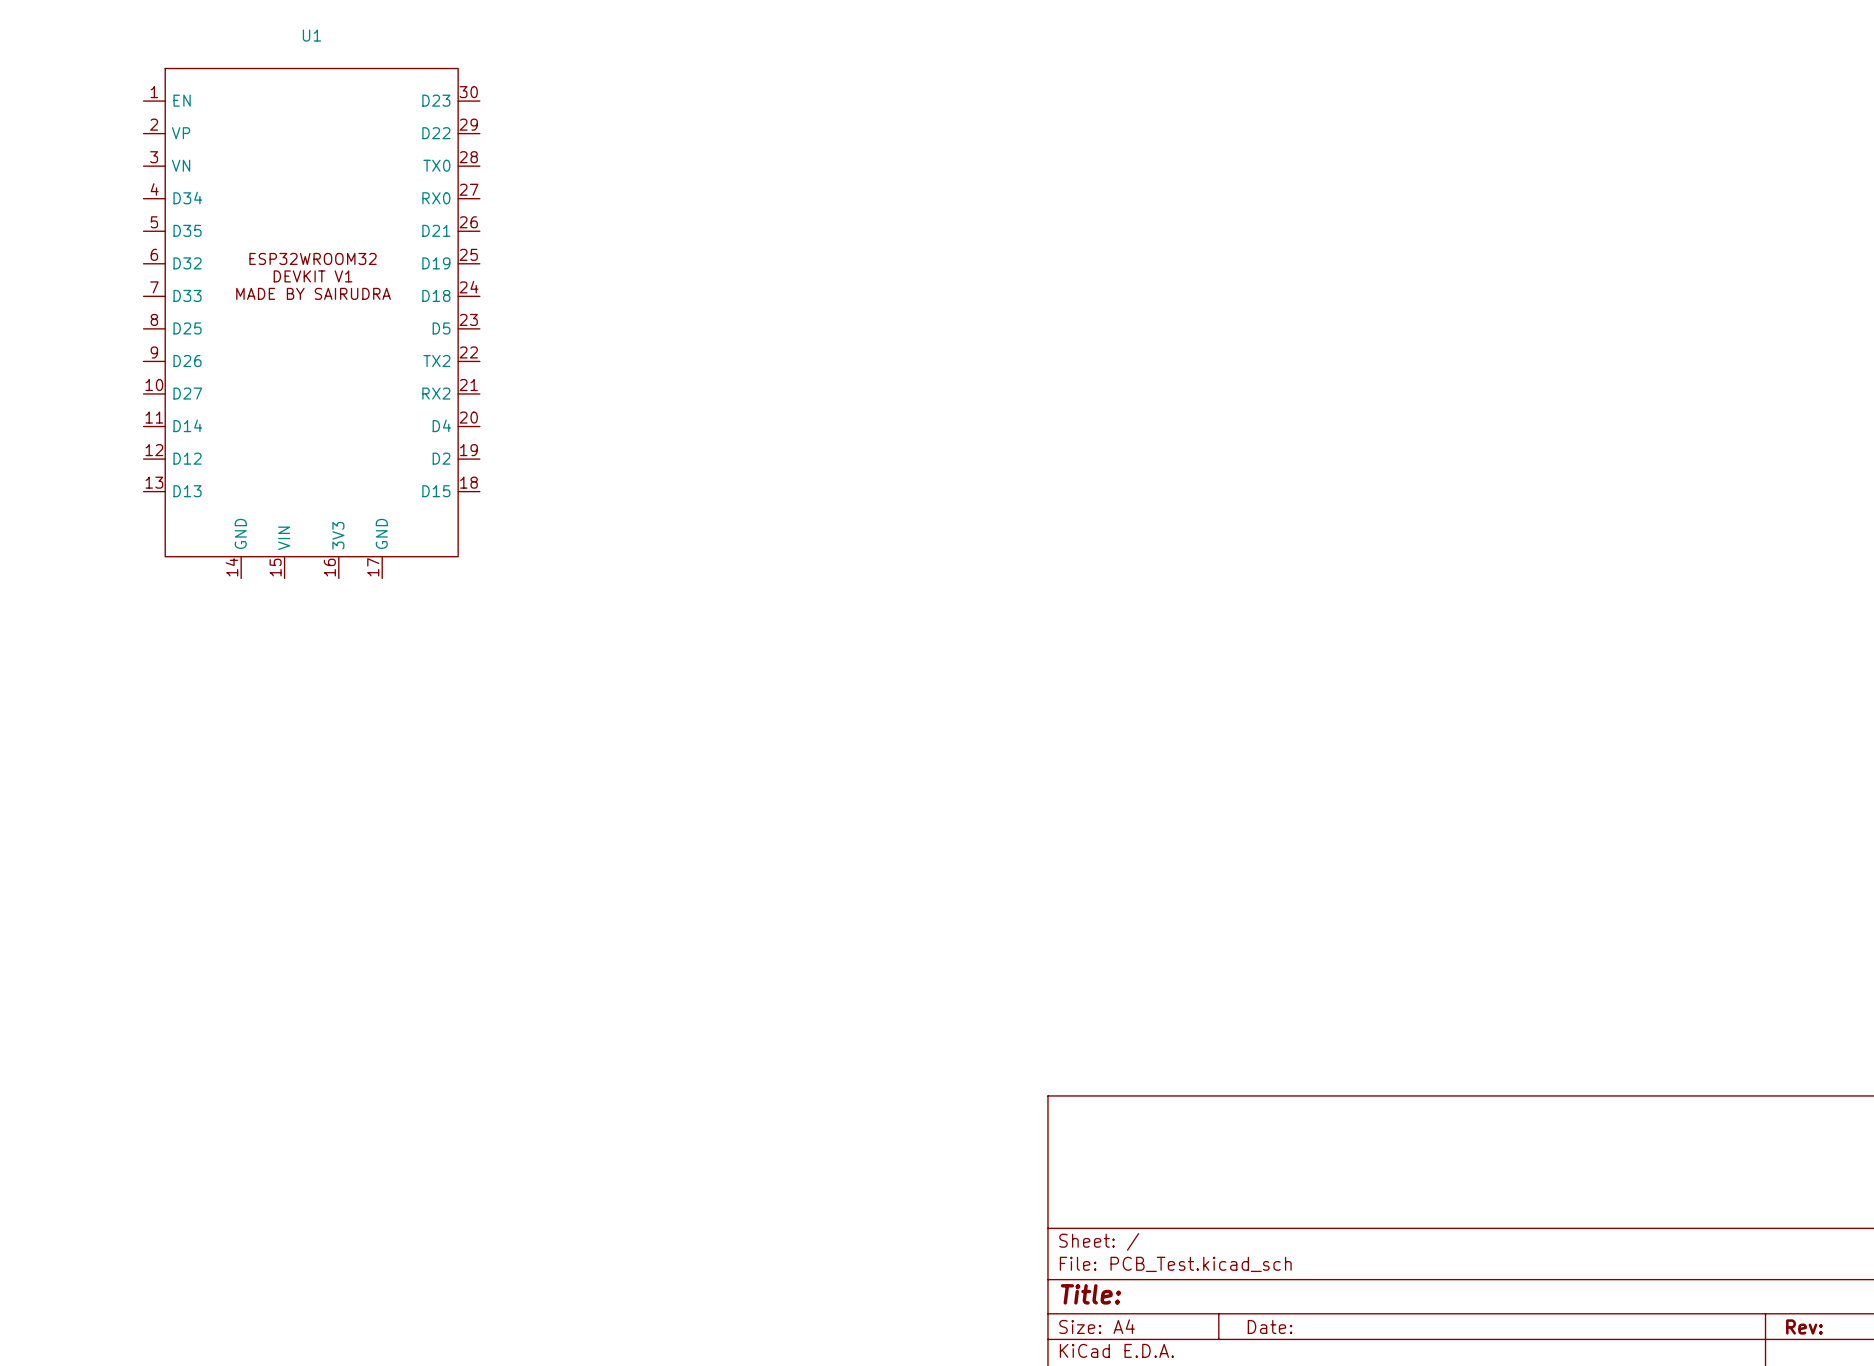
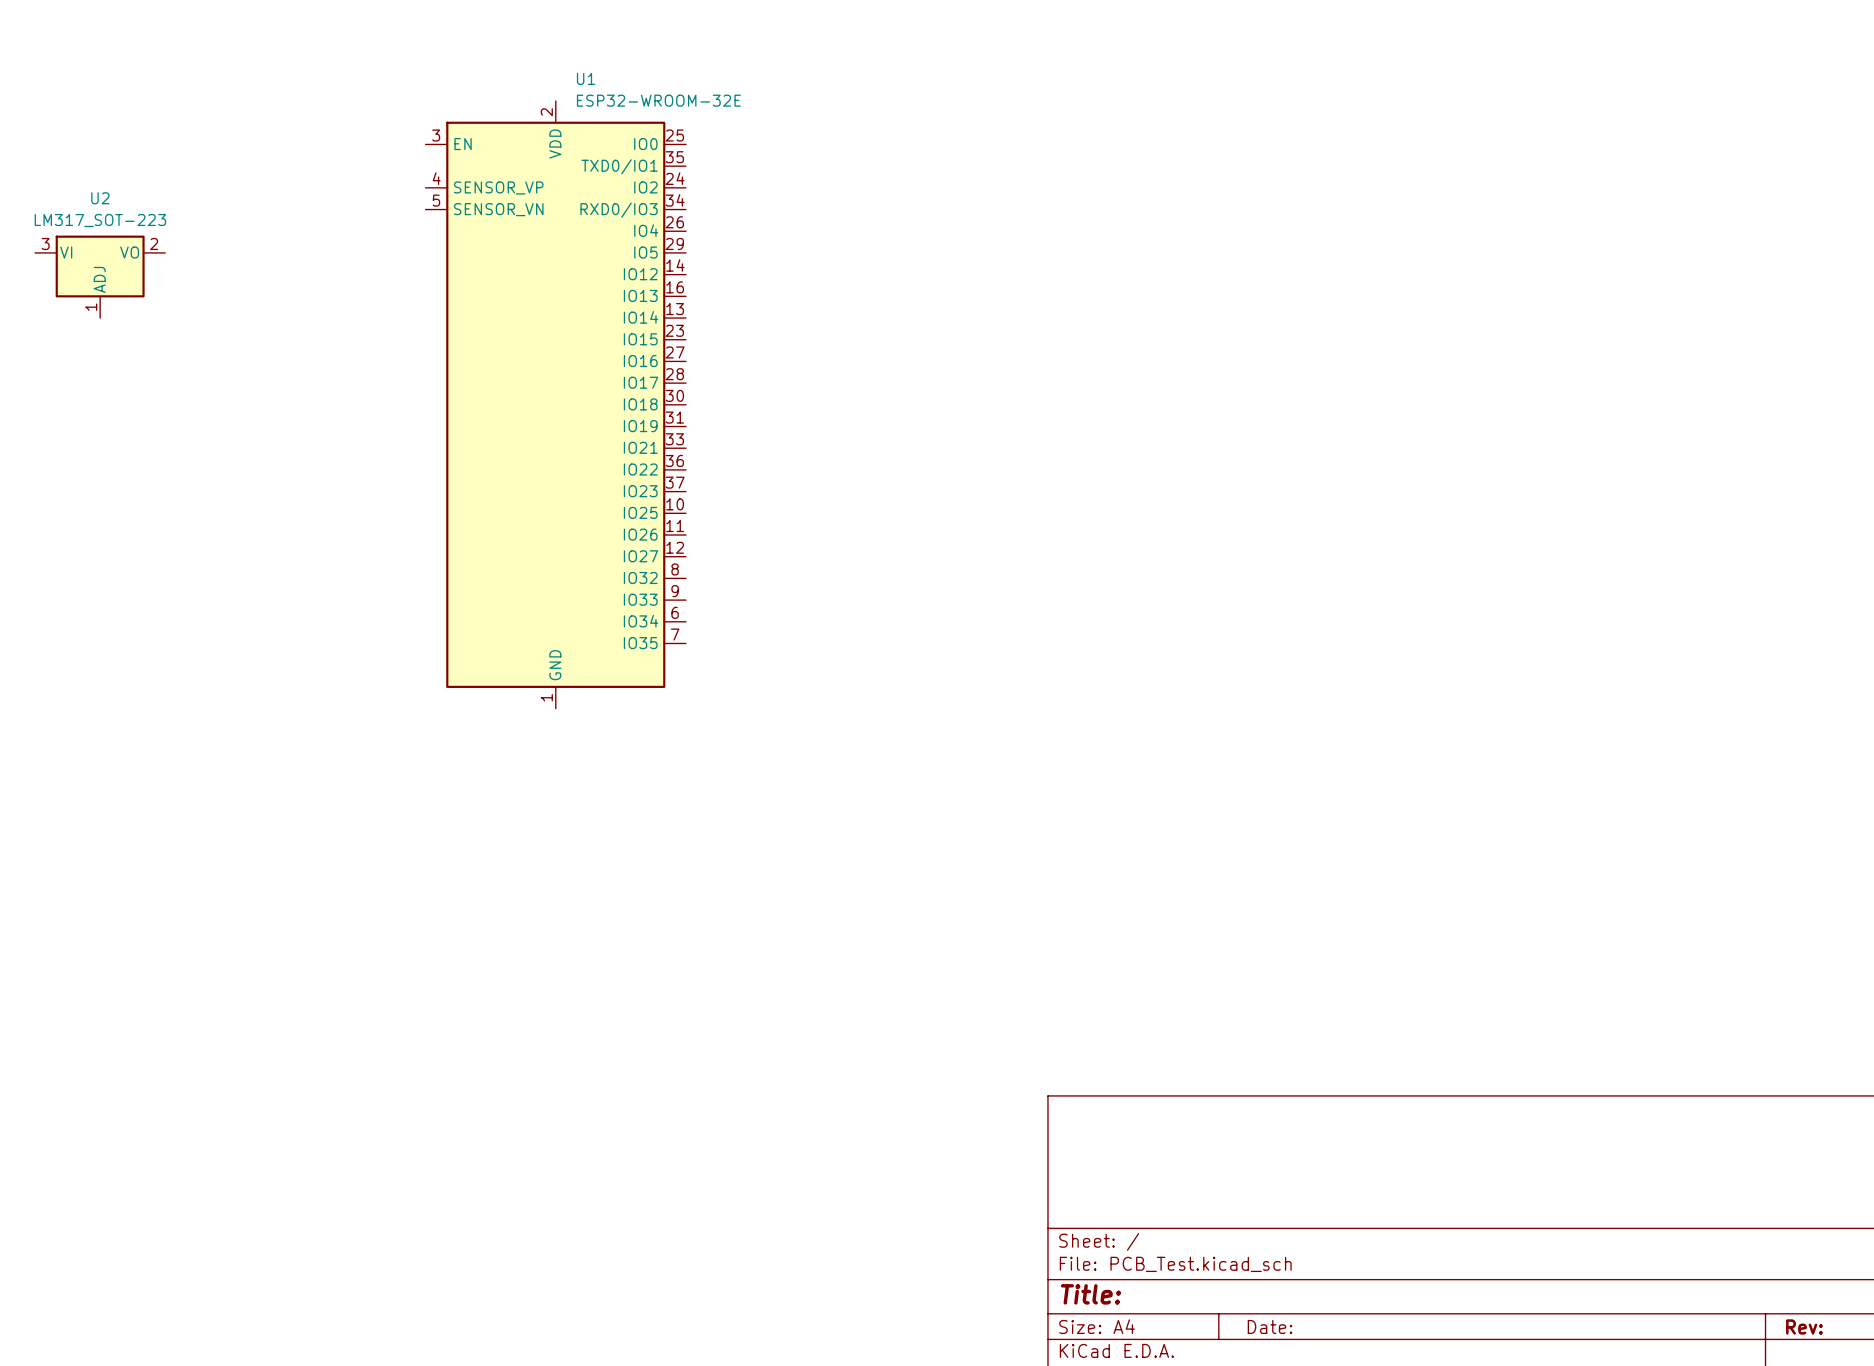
U1 name position: U1 (311, 35) -> U1 (586, 78)
U1 symbol: [143, 68, 480, 579] -> [425, 101, 686, 709]
U1 value: none -> ESP32-WROOM-32E (658, 100)
U2: none -> LM317_SOT-223 (100, 276)

